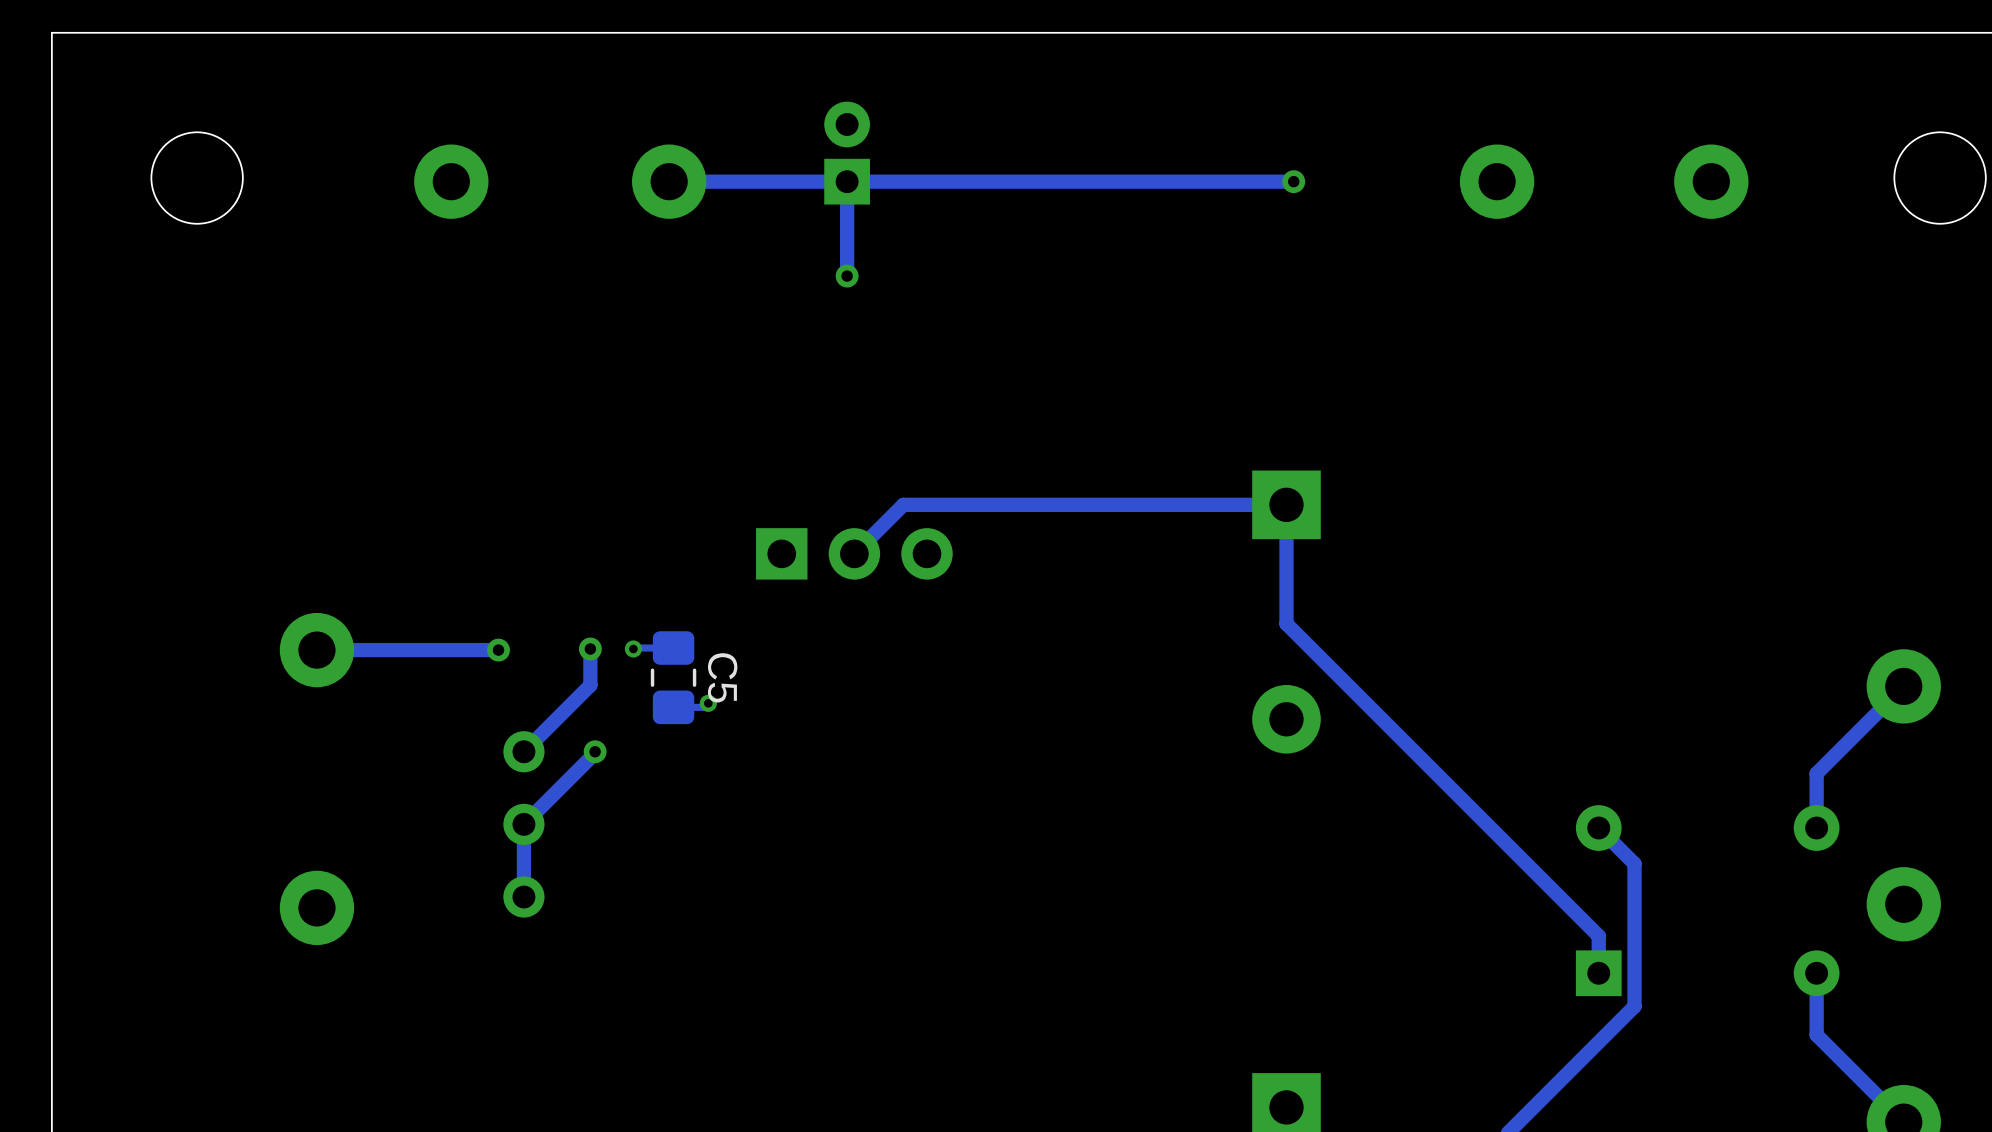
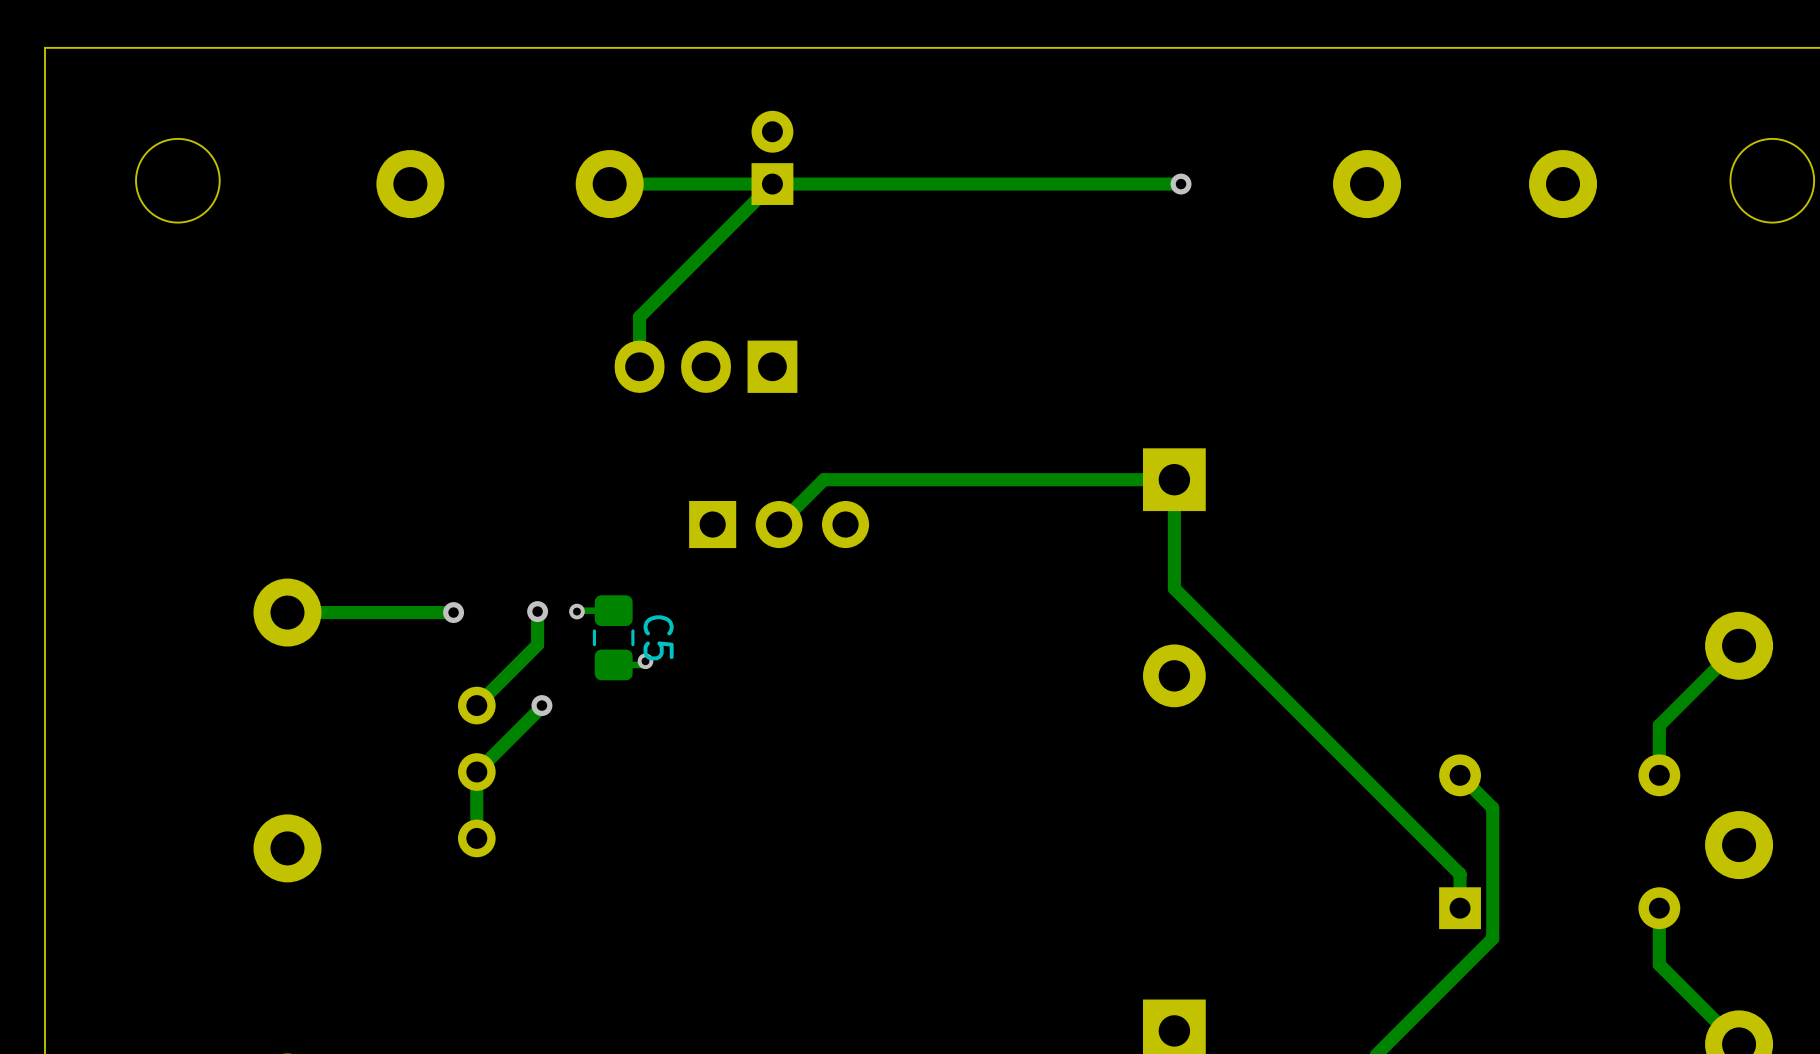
track: (847, 181) (847, 276) -> (772, 184) (639, 316) (639, 366)
via: (847, 276) -> none
part: none -> (706, 366)

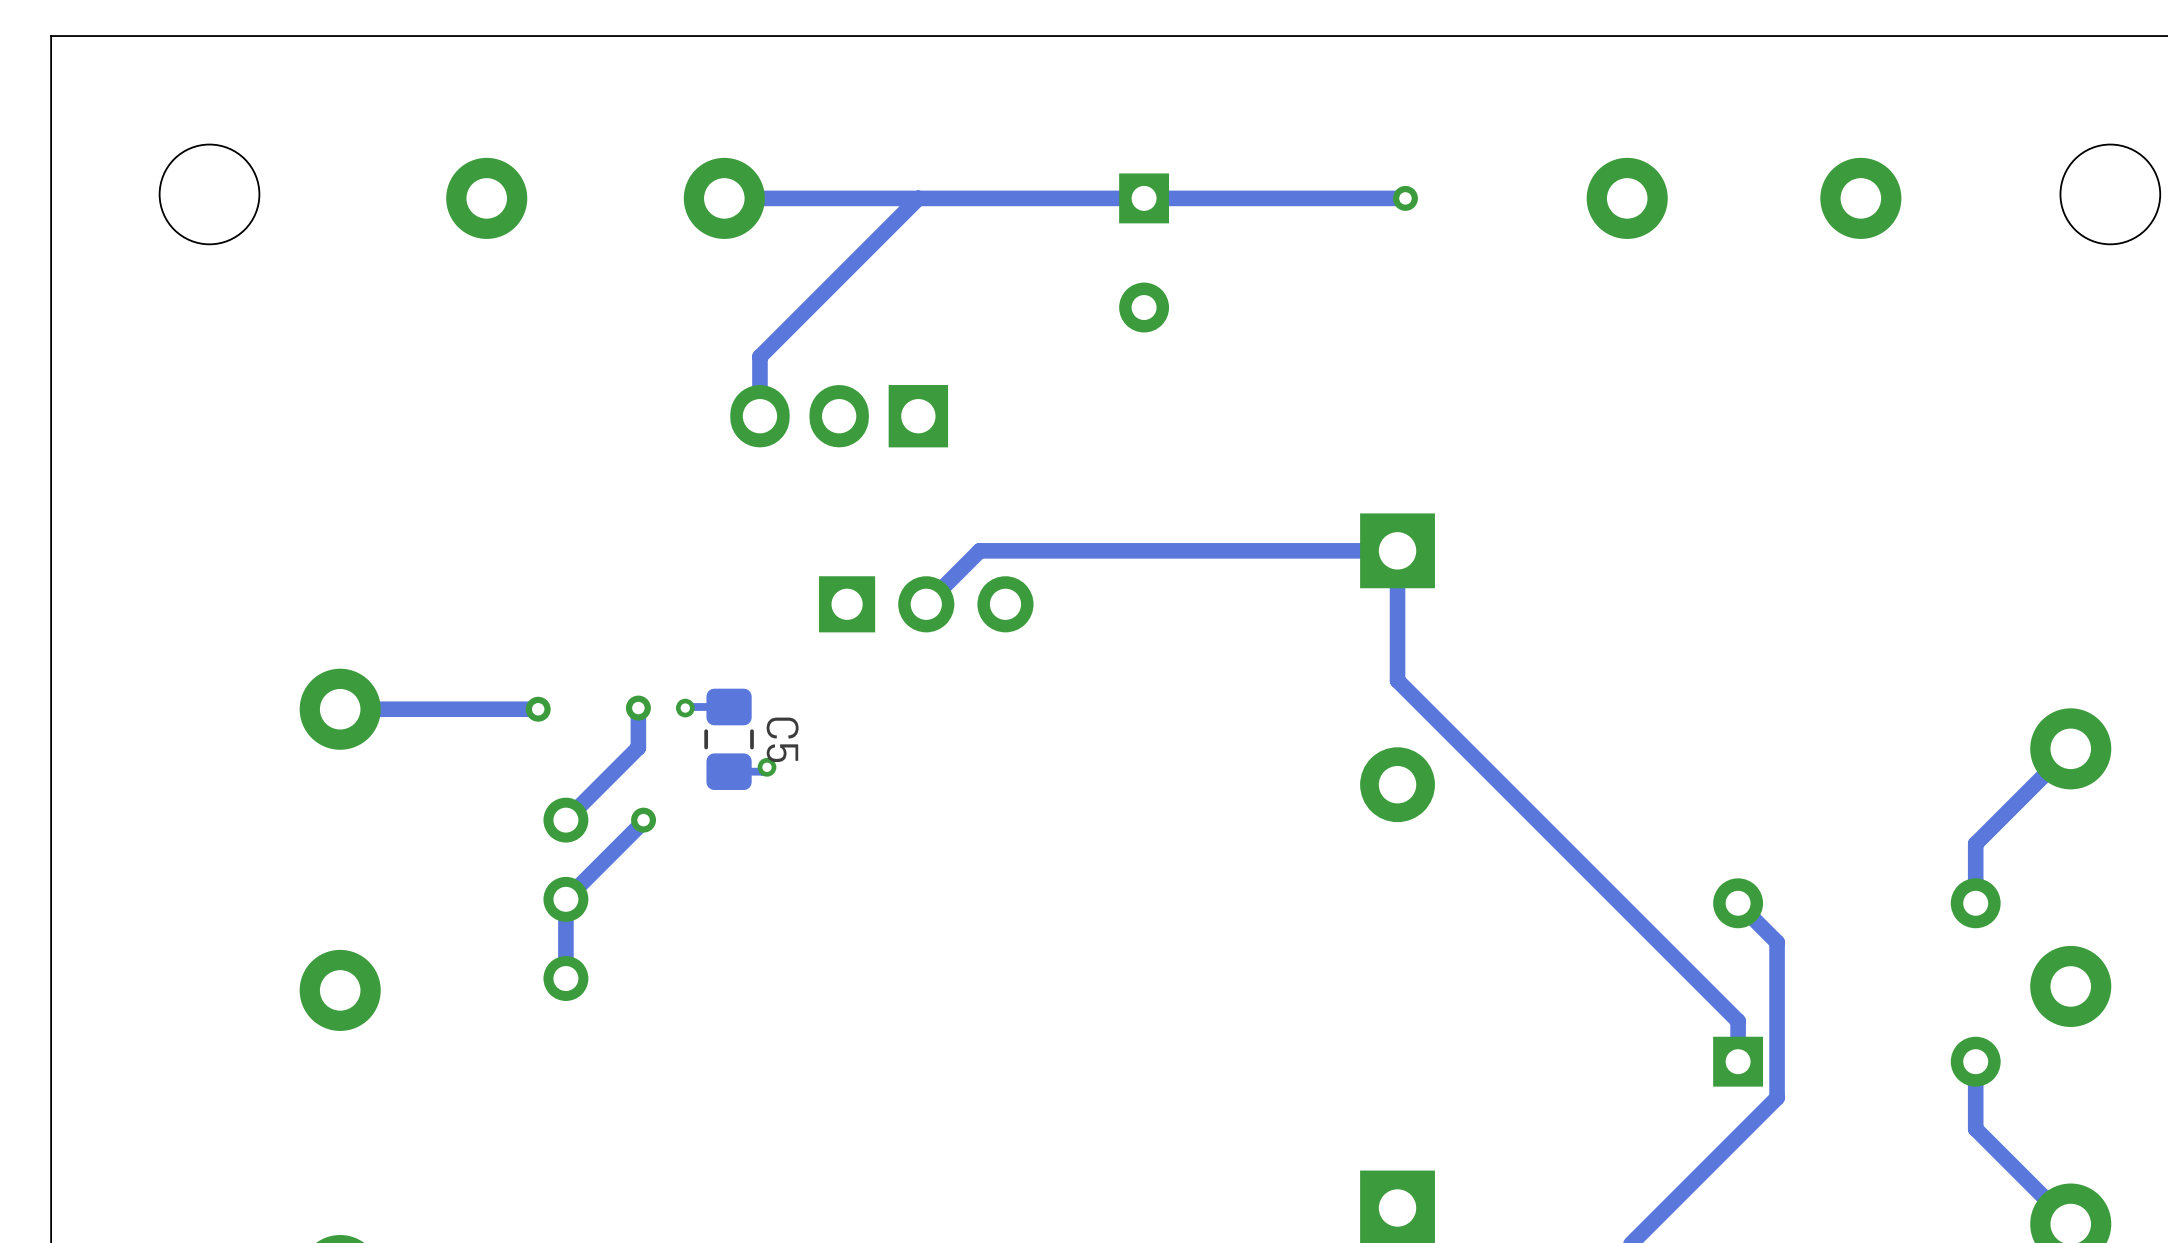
part: (772, 157) -> none
part: none -> (1144, 252)

